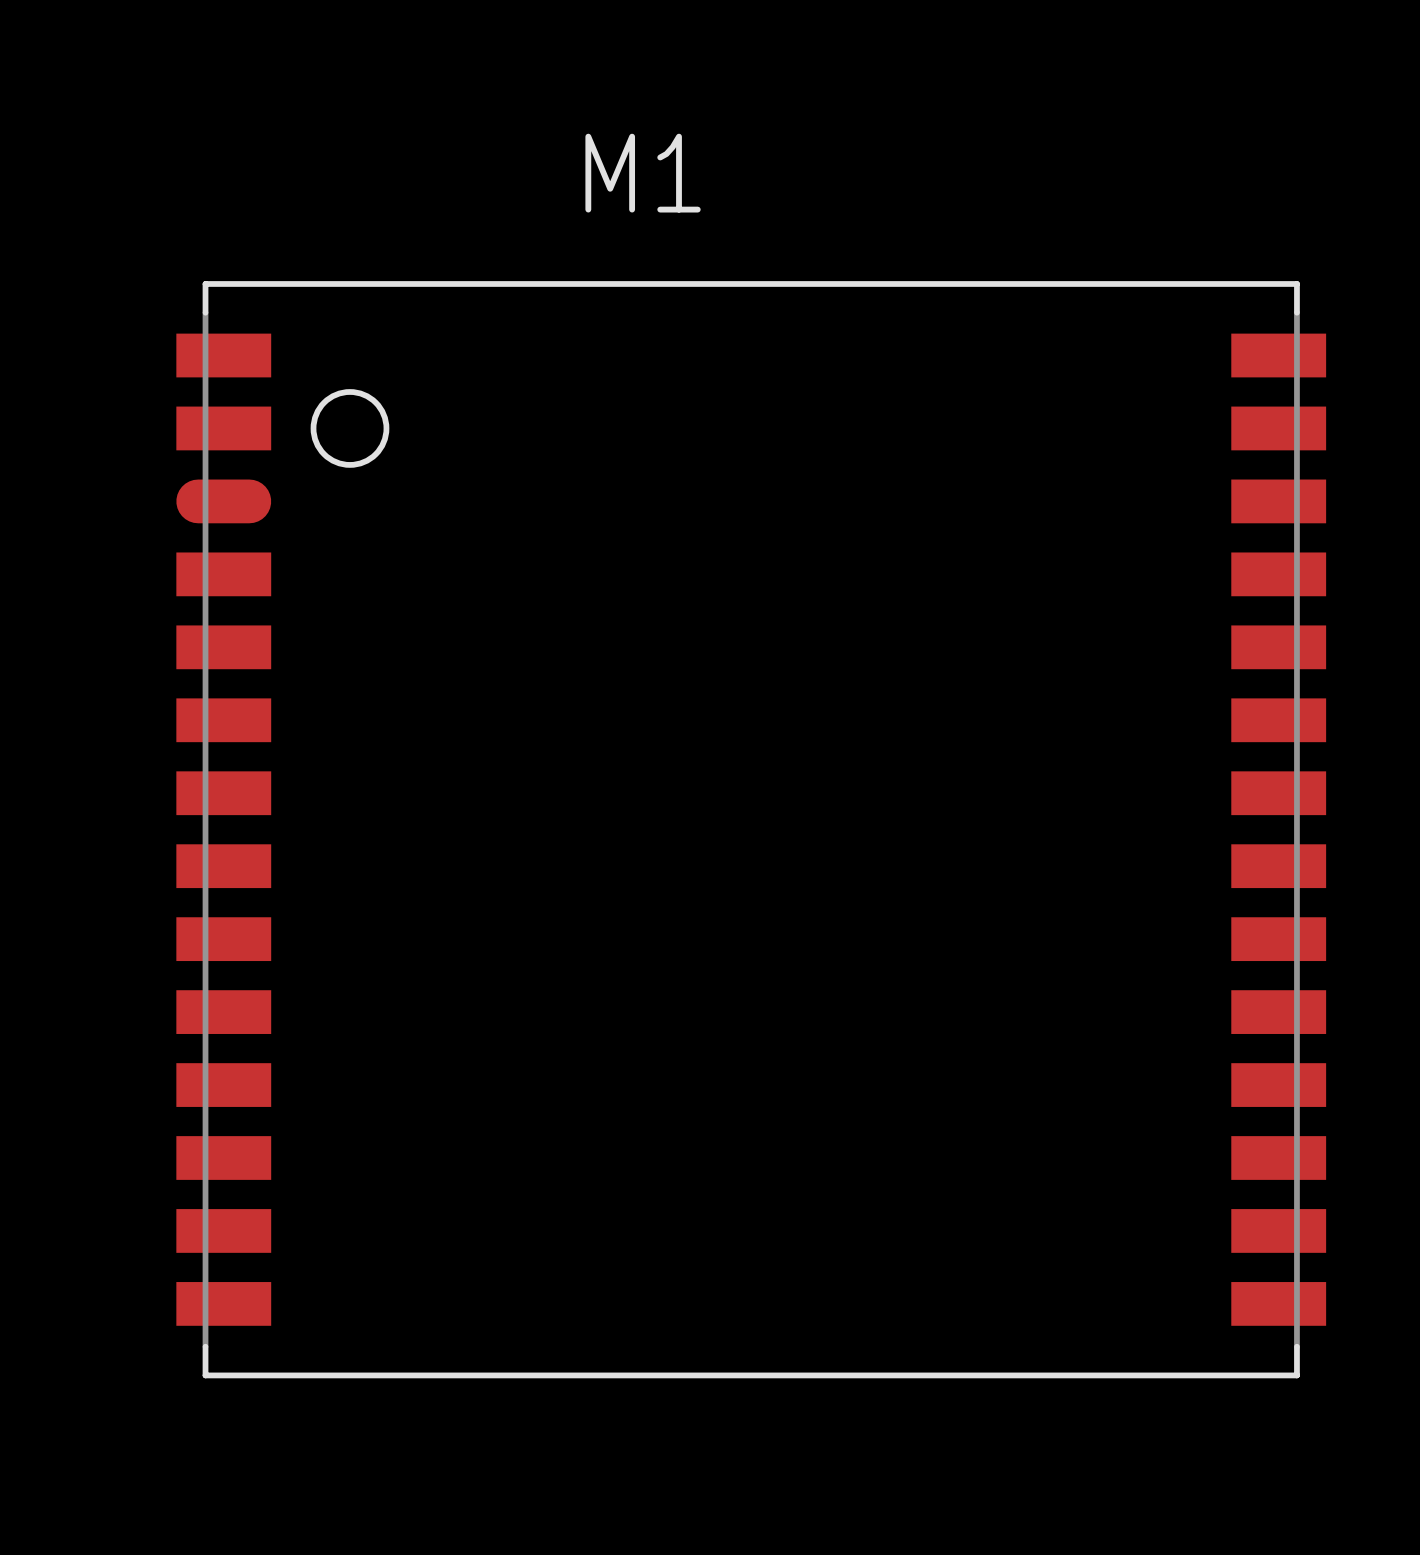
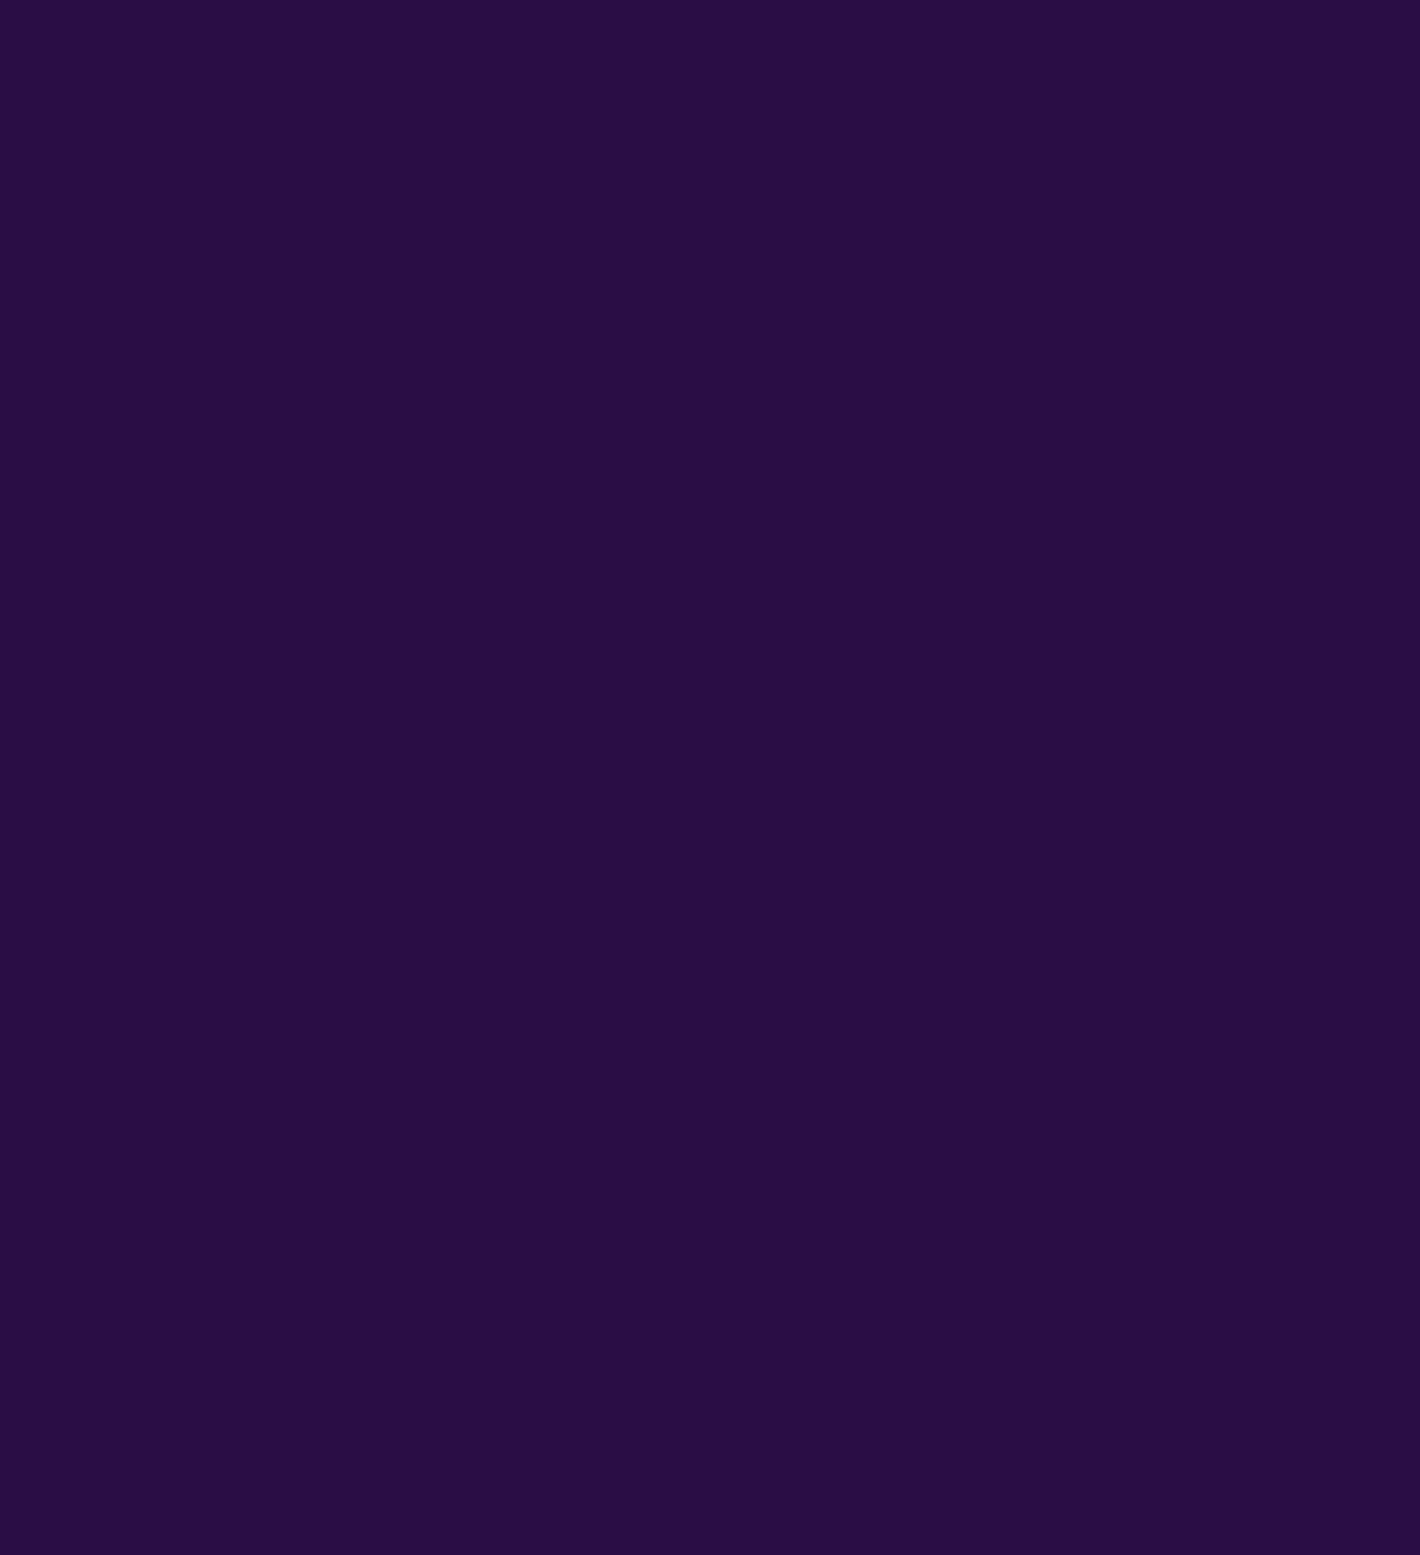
M1: (751, 829) -> none

